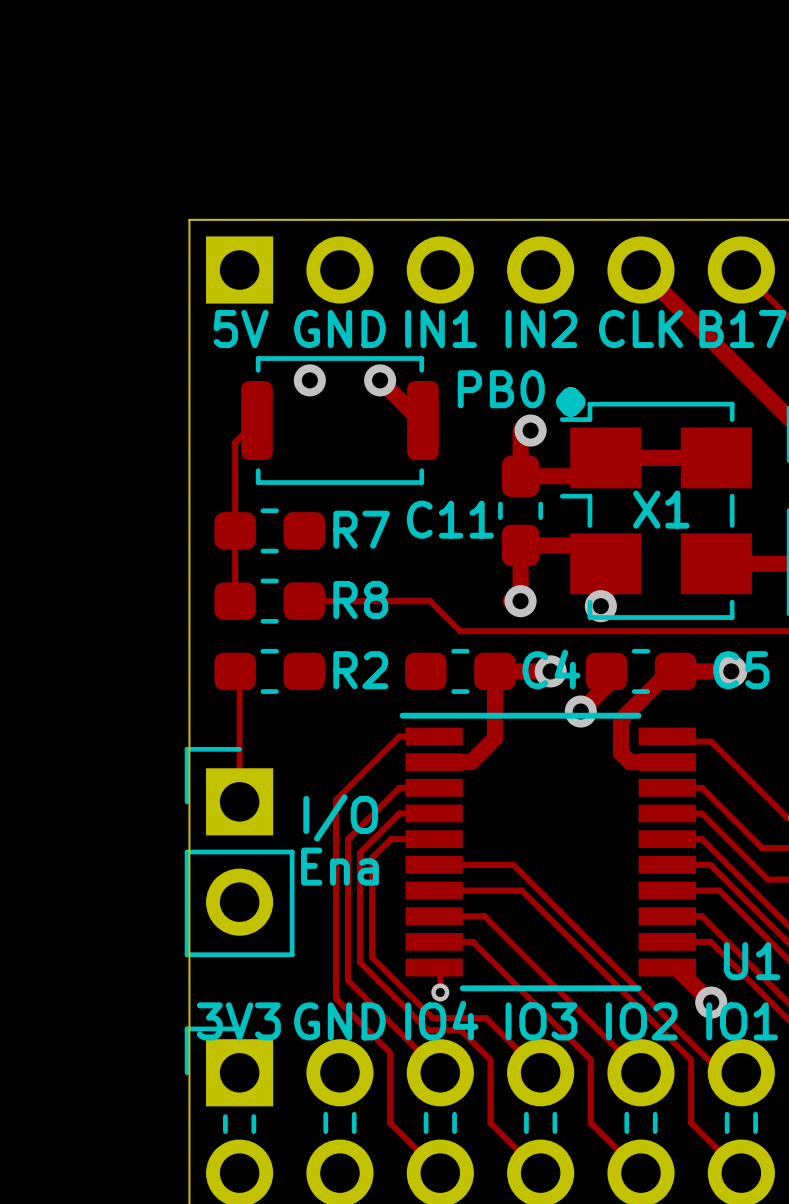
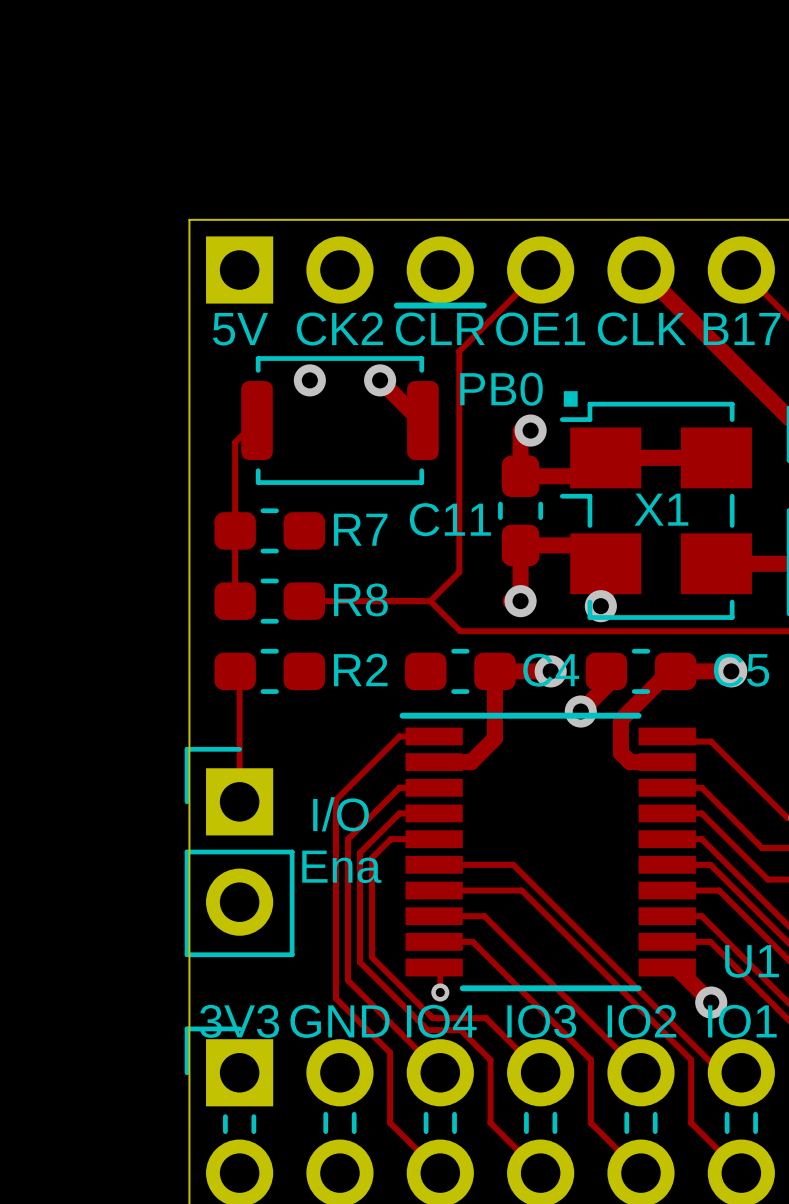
track: none -> (540, 270) (459, 351) (459, 572) (430, 601)
text: GND (339, 329) -> CK2 (339, 329)
text: IN1 (441, 329) -> ~{CLR} (440, 325)
text: IN2 (541, 329) -> OE1 (540, 329)

